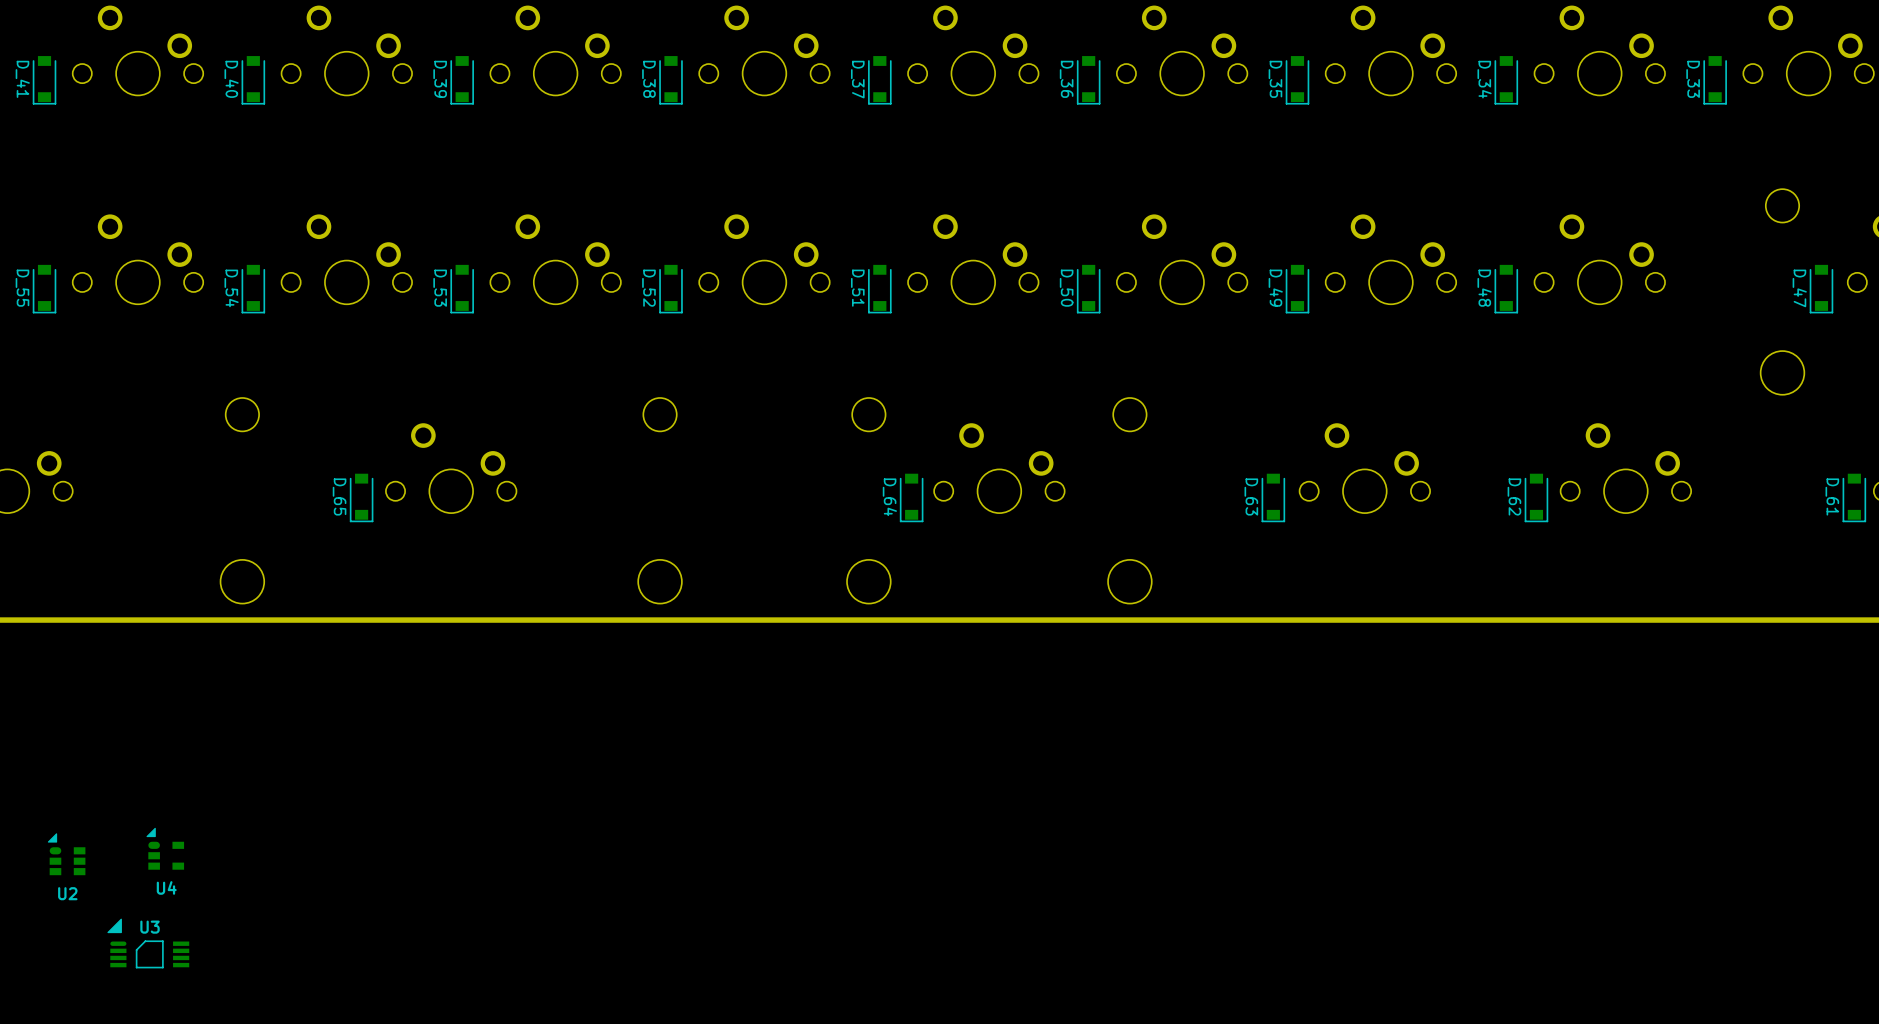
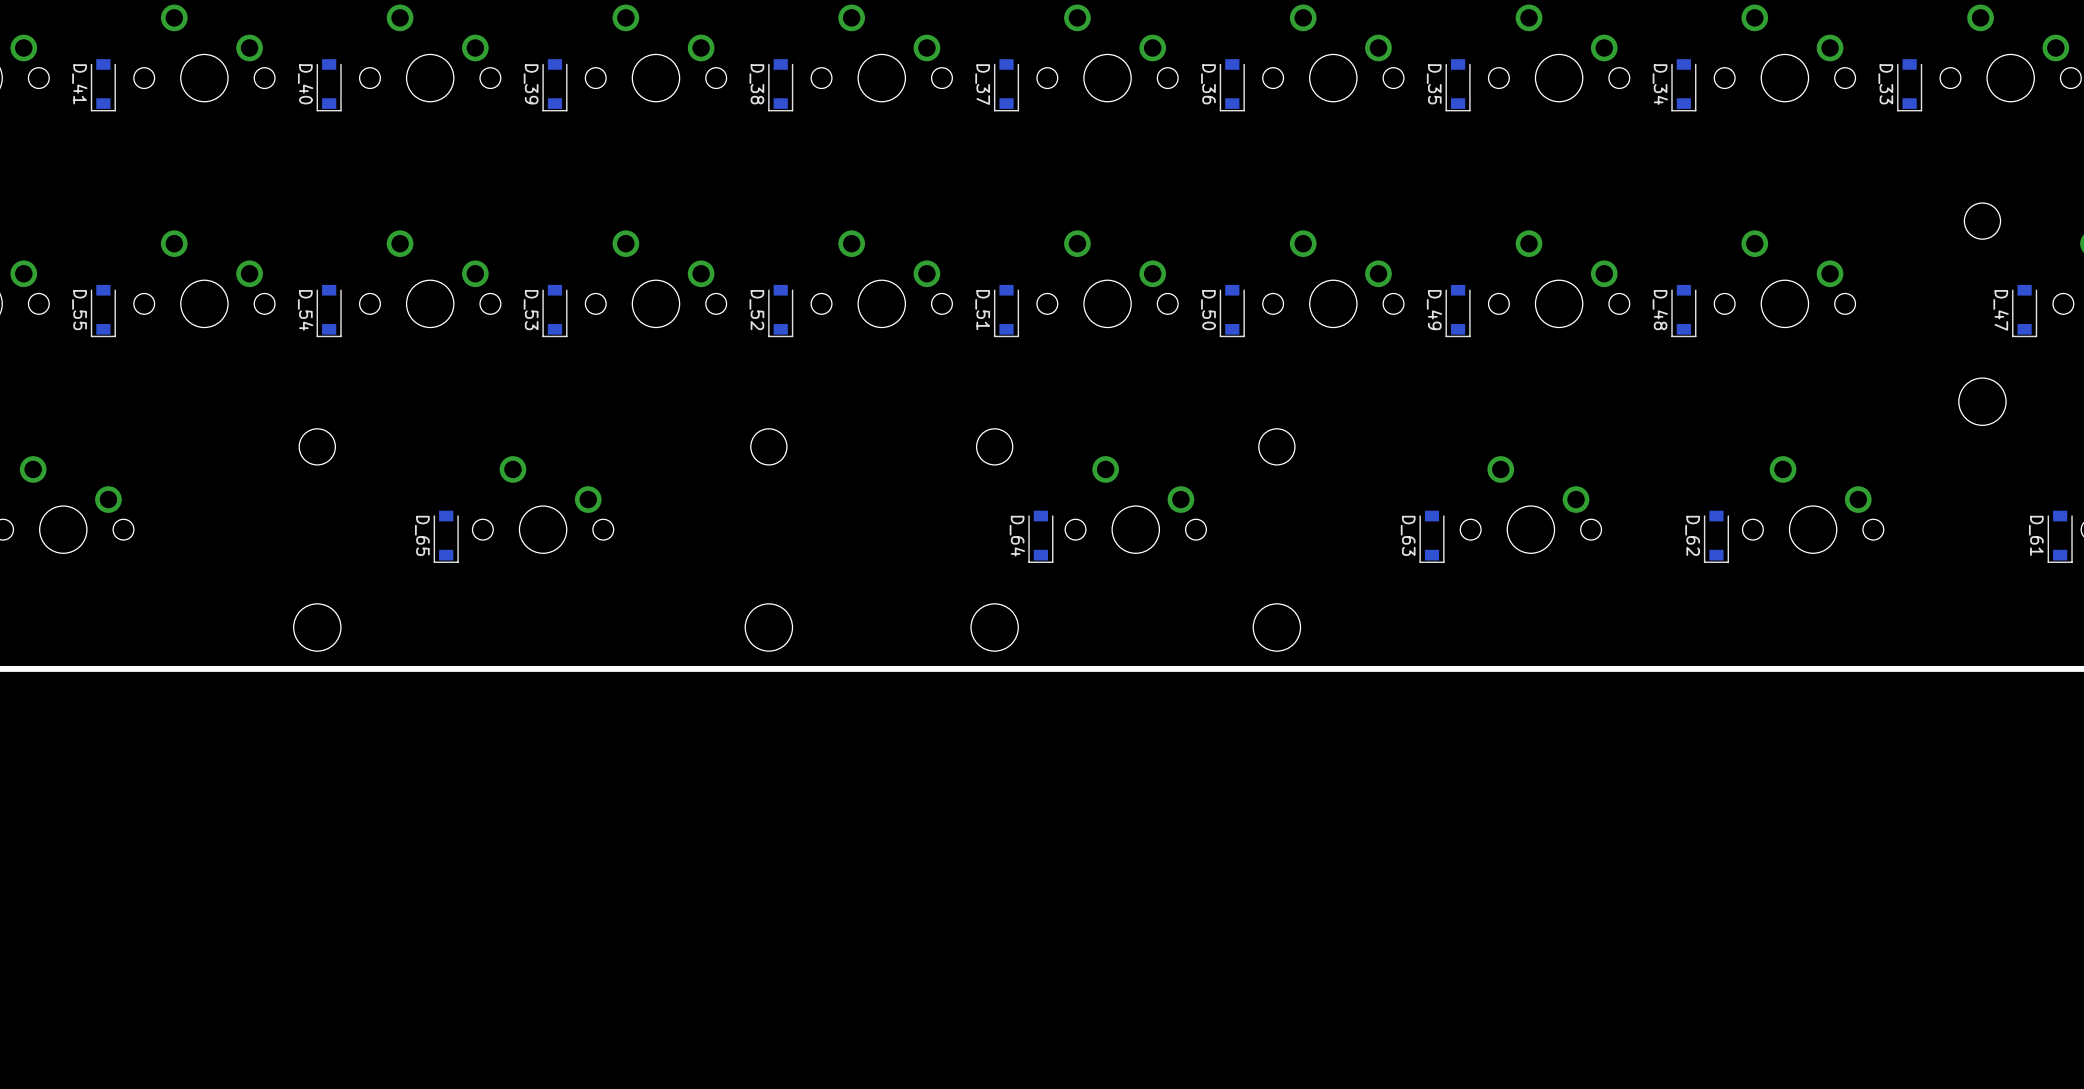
U4: (165, 848) -> none
U2: (66, 854) -> none
U3: (148, 943) -> none

